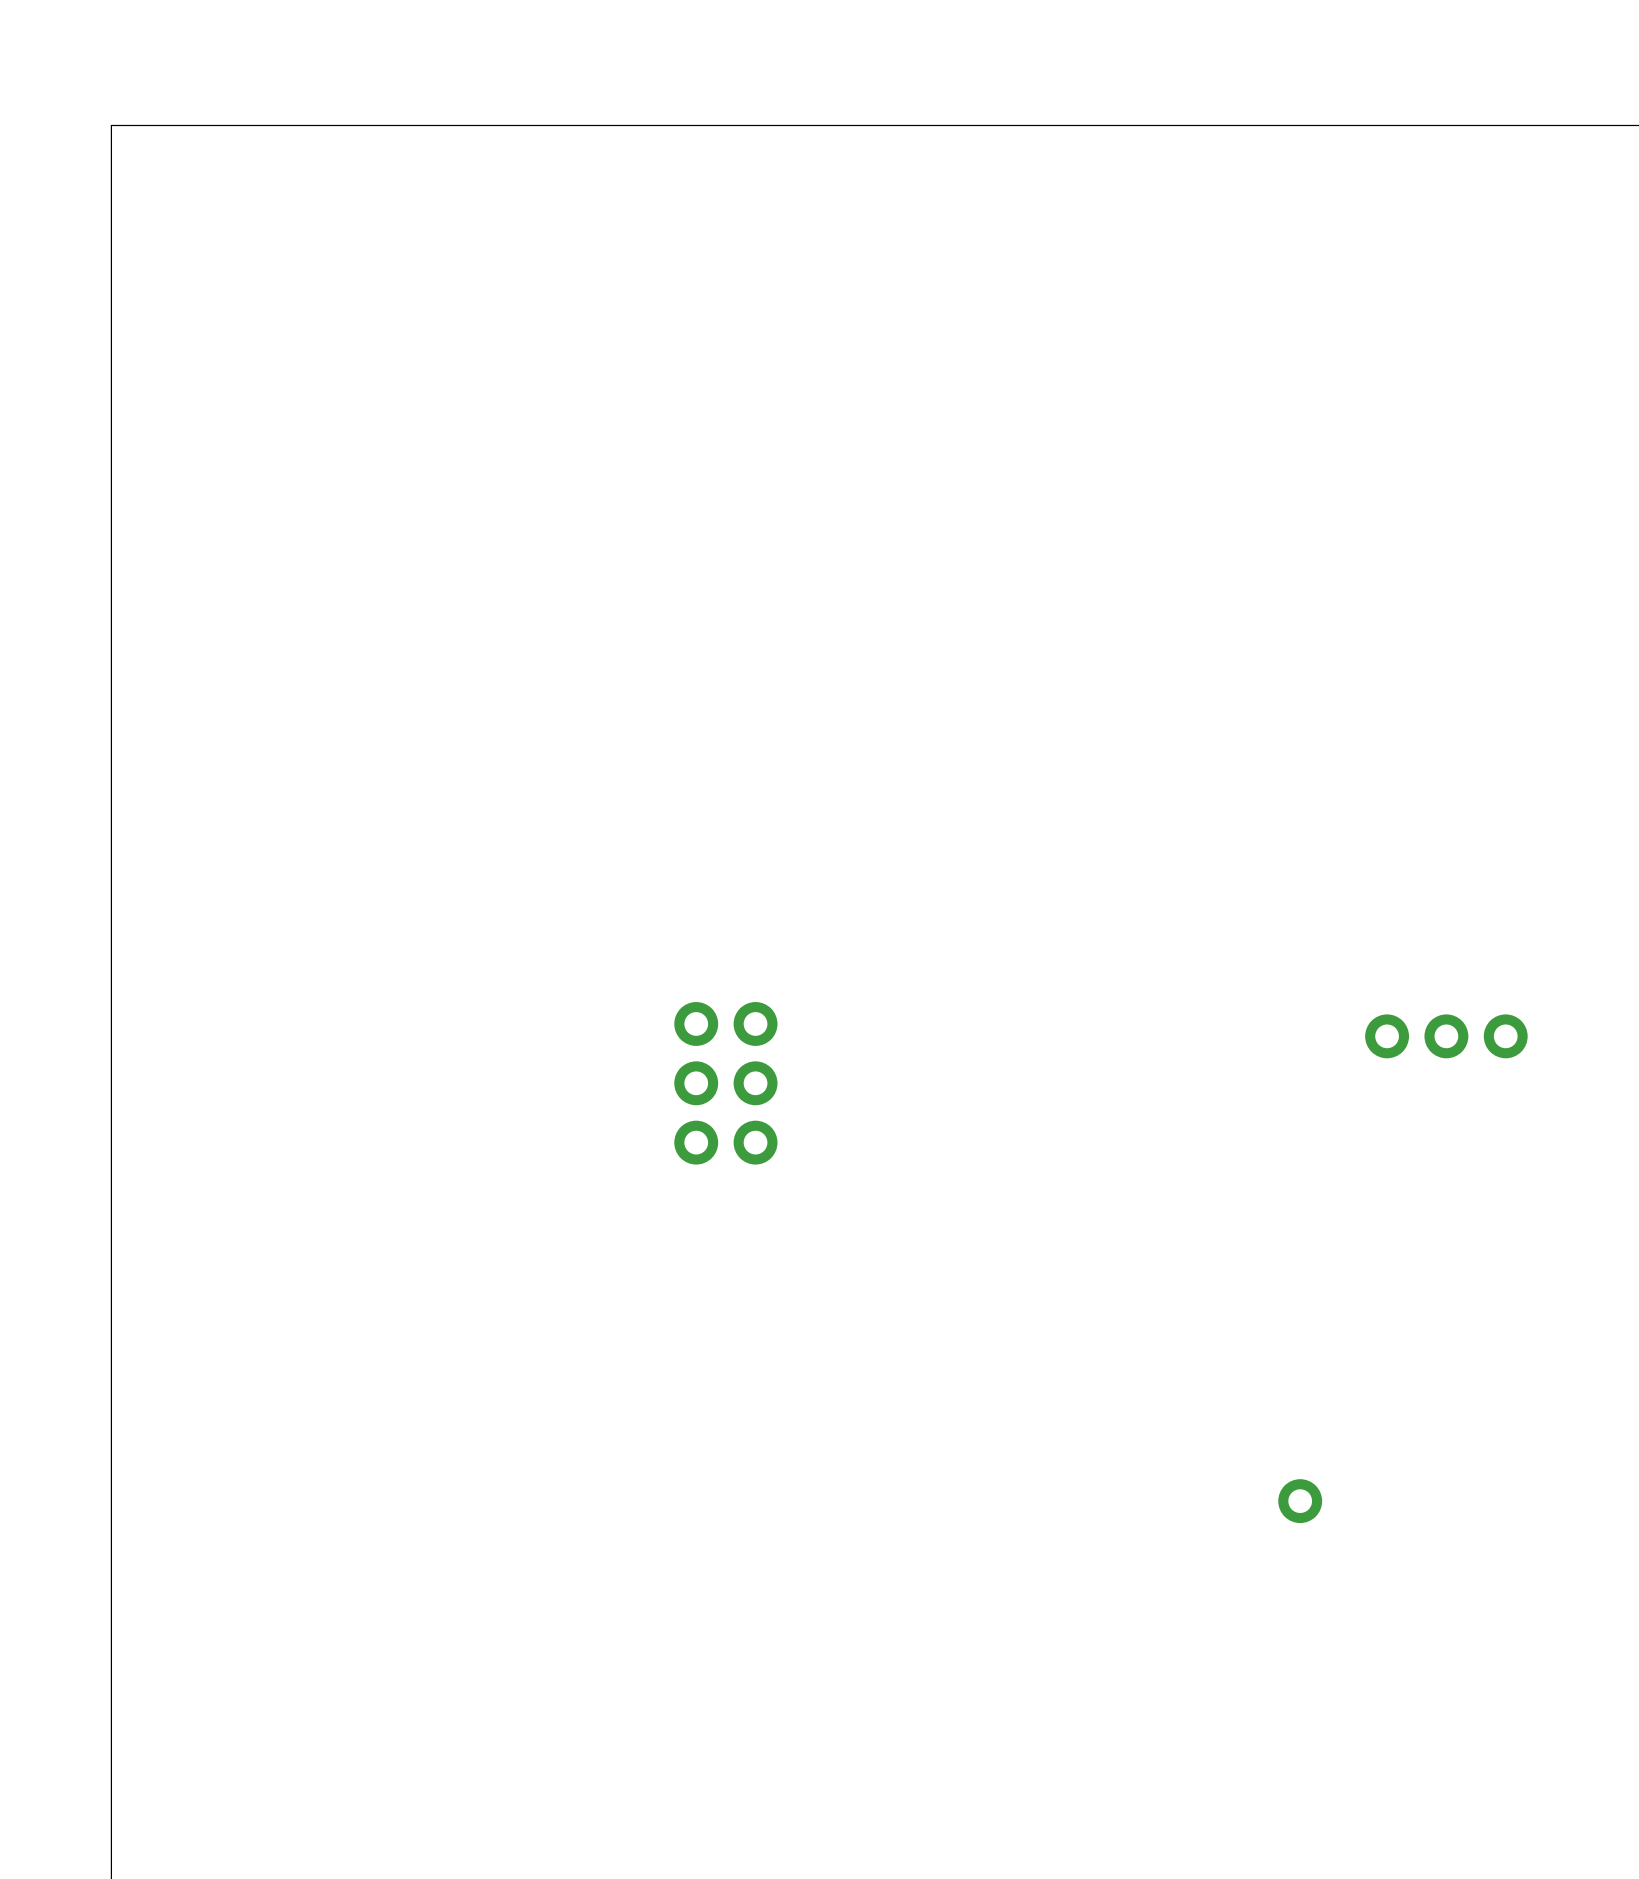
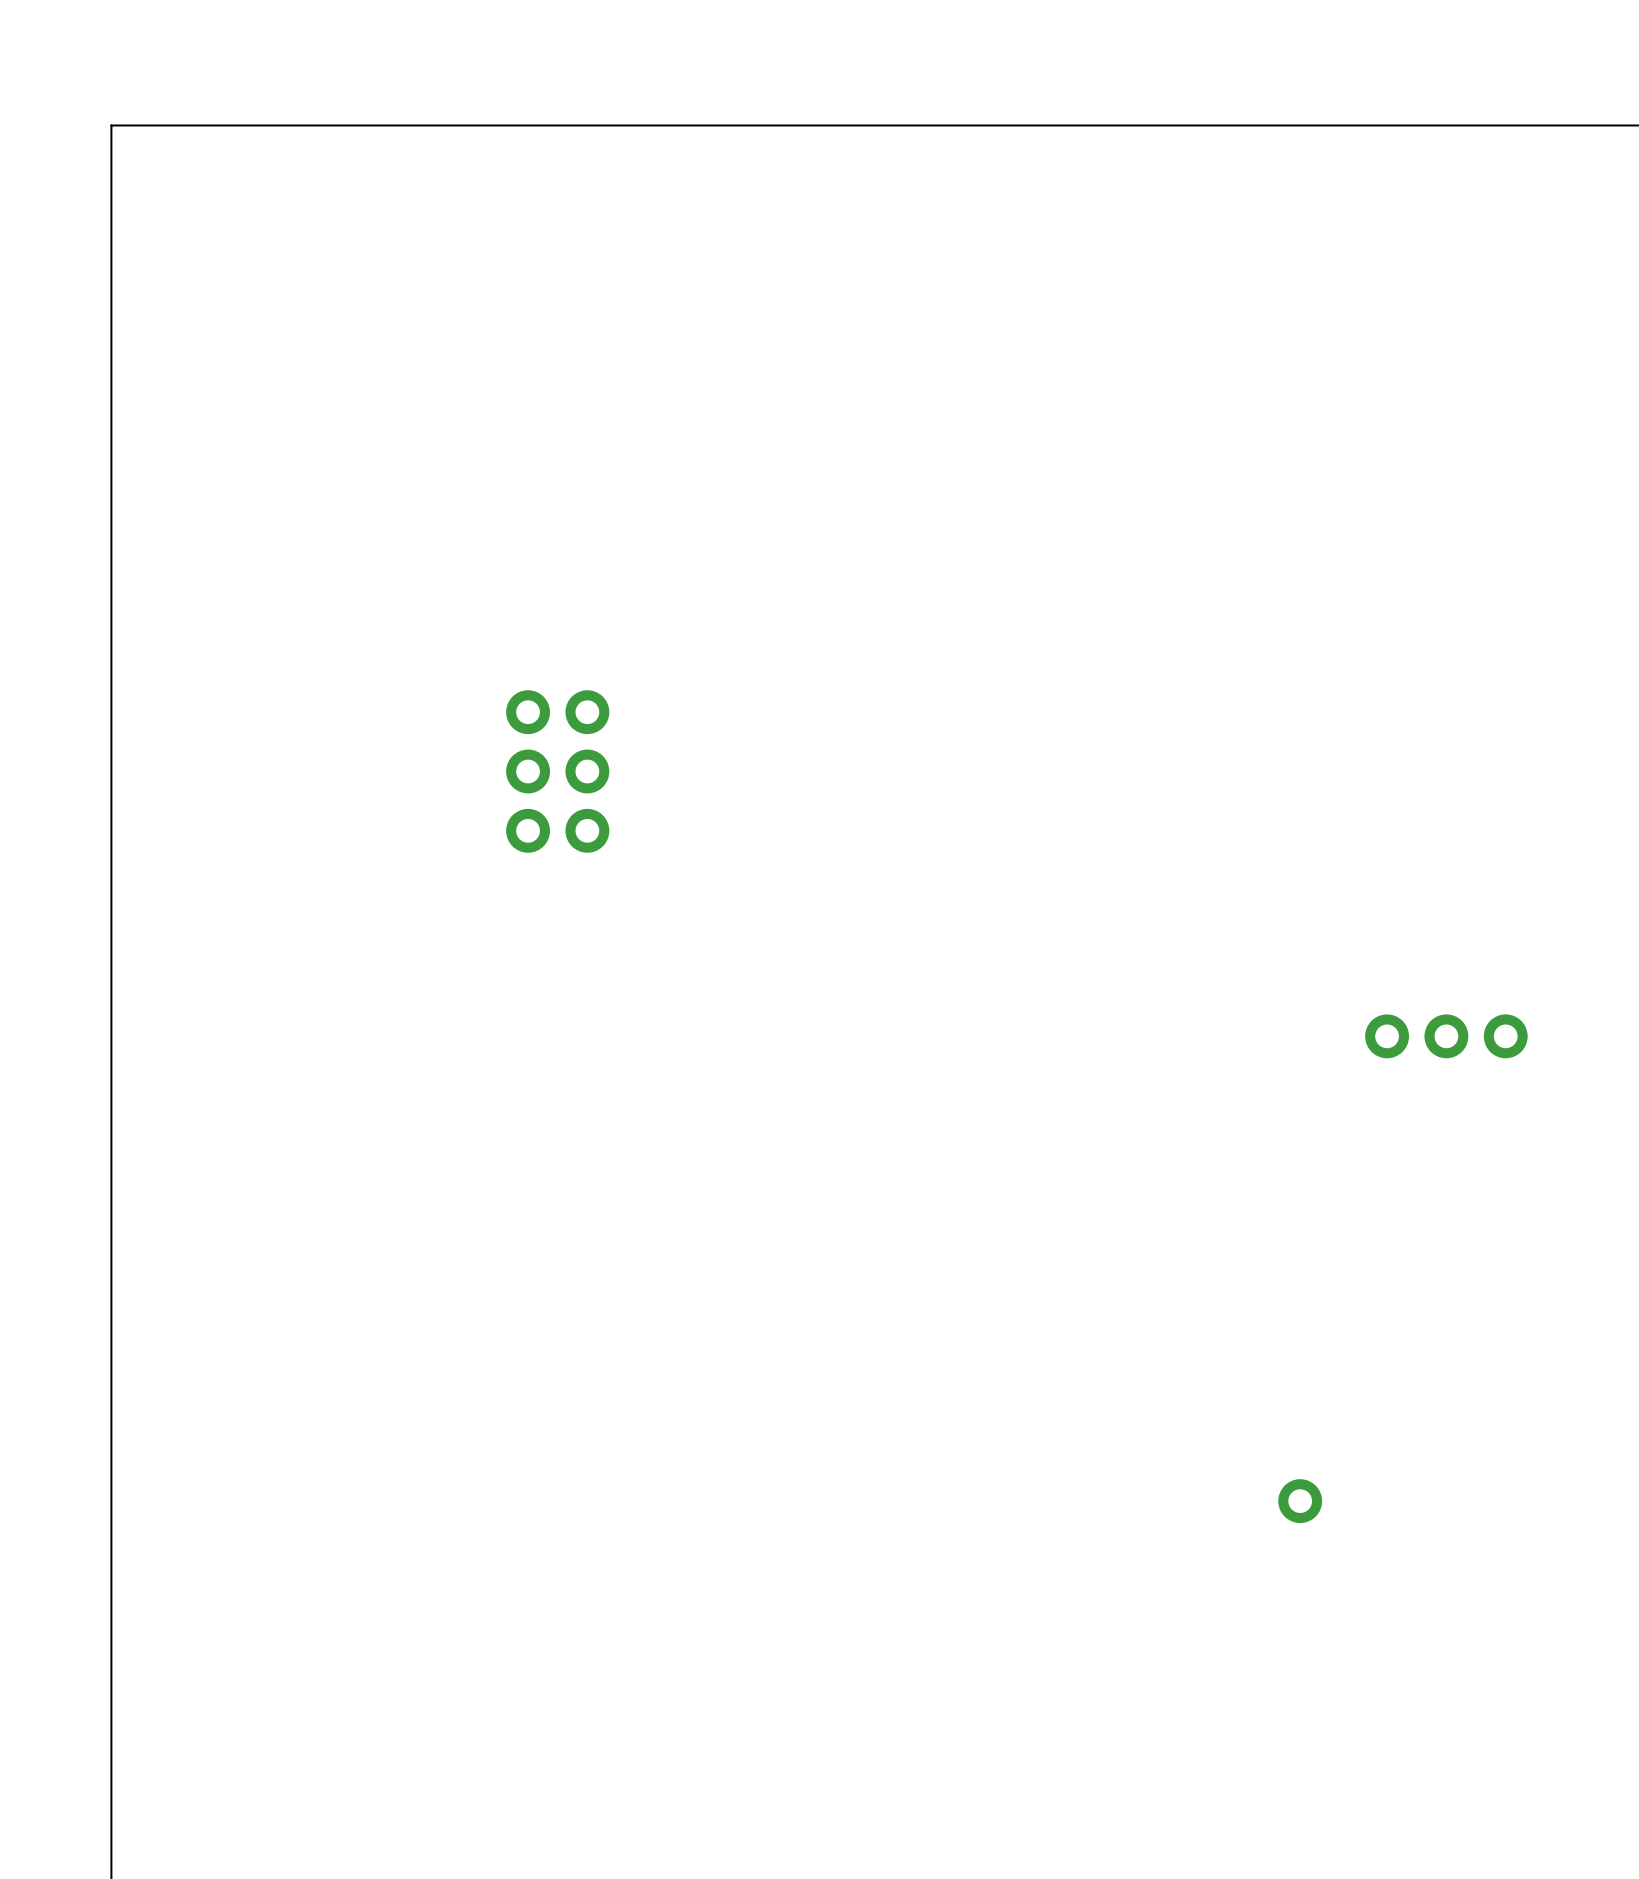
part position: (725, 1083) -> (557, 771)

